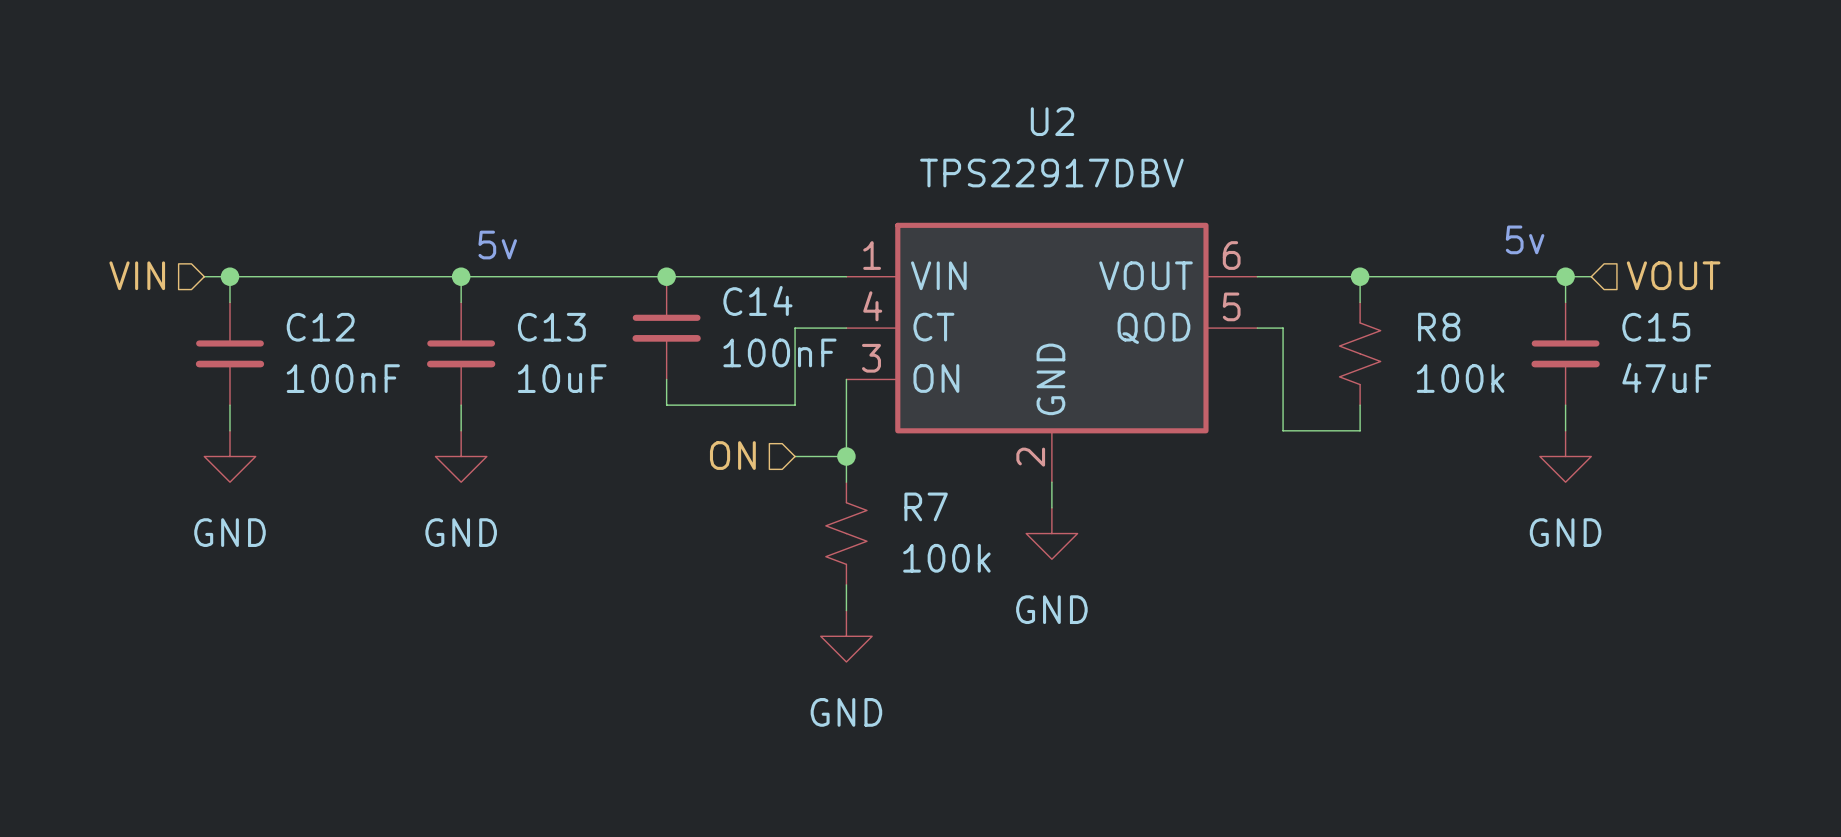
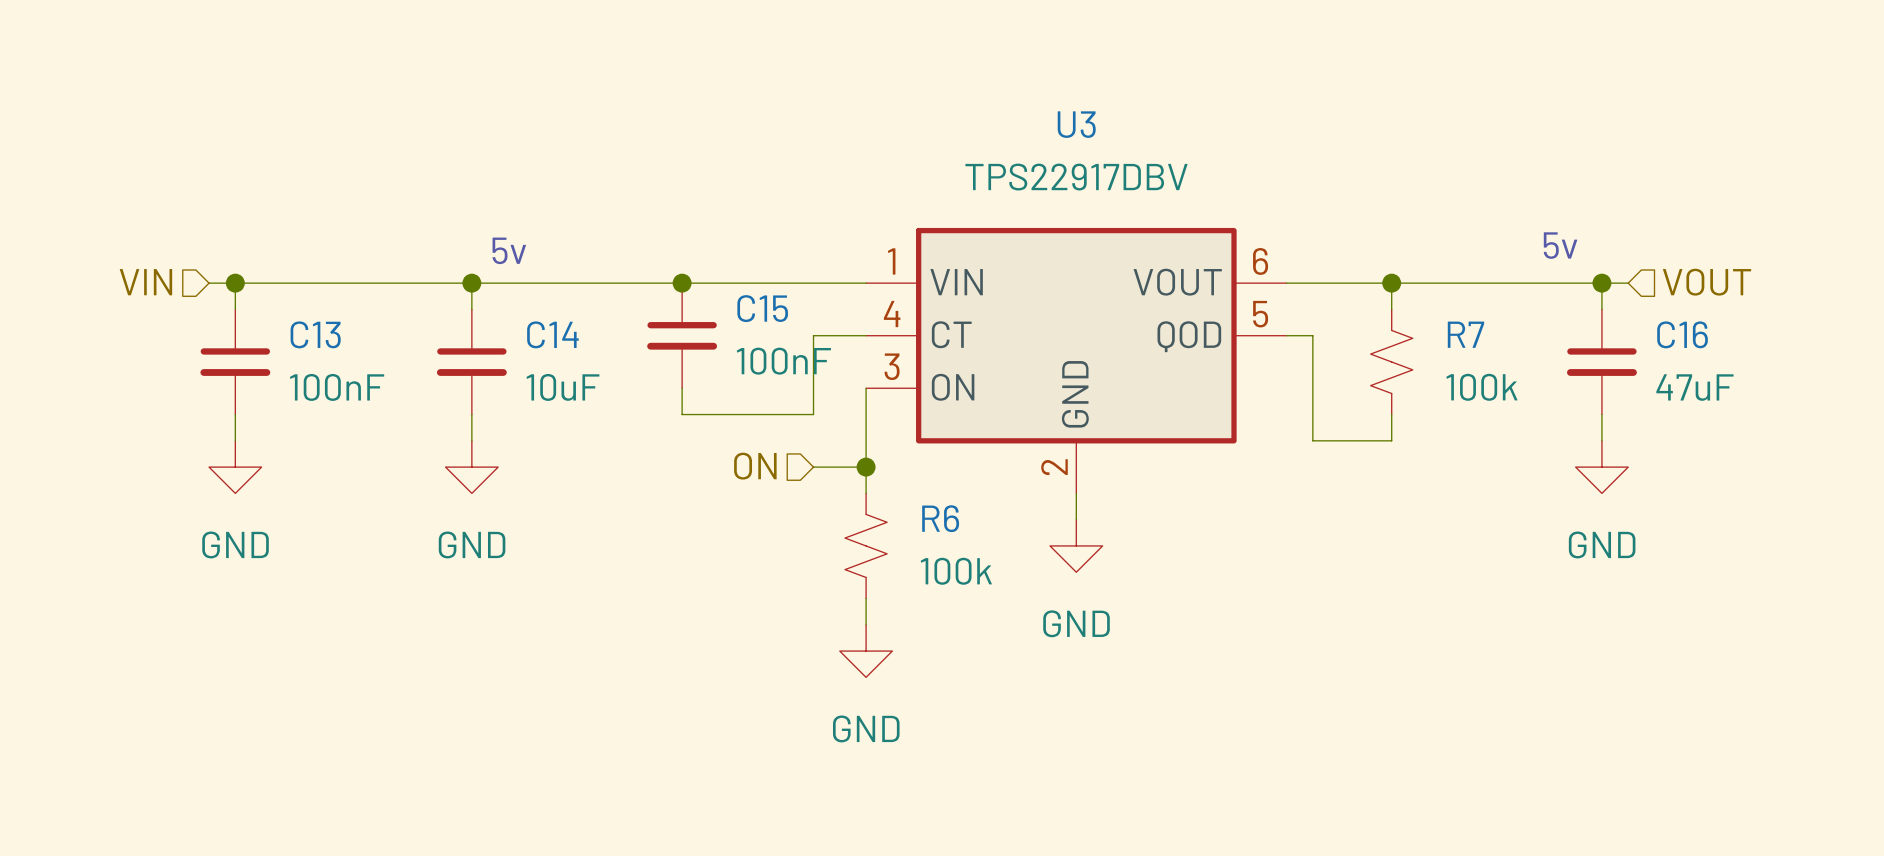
U2 name: U2 (1052, 121) -> U3 (1076, 124)
C14 name: C14 (757, 300) -> C15 (762, 308)
C12 name: C12 (320, 327) -> C13 (315, 334)
C13 name: C13 (551, 327) -> C14 (552, 334)
R8 name: R8 (1439, 327) -> R7 (1465, 334)
C15 name: C15 (1656, 327) -> C16 (1682, 334)
R7 name: R7 (926, 506) -> R6 (940, 518)

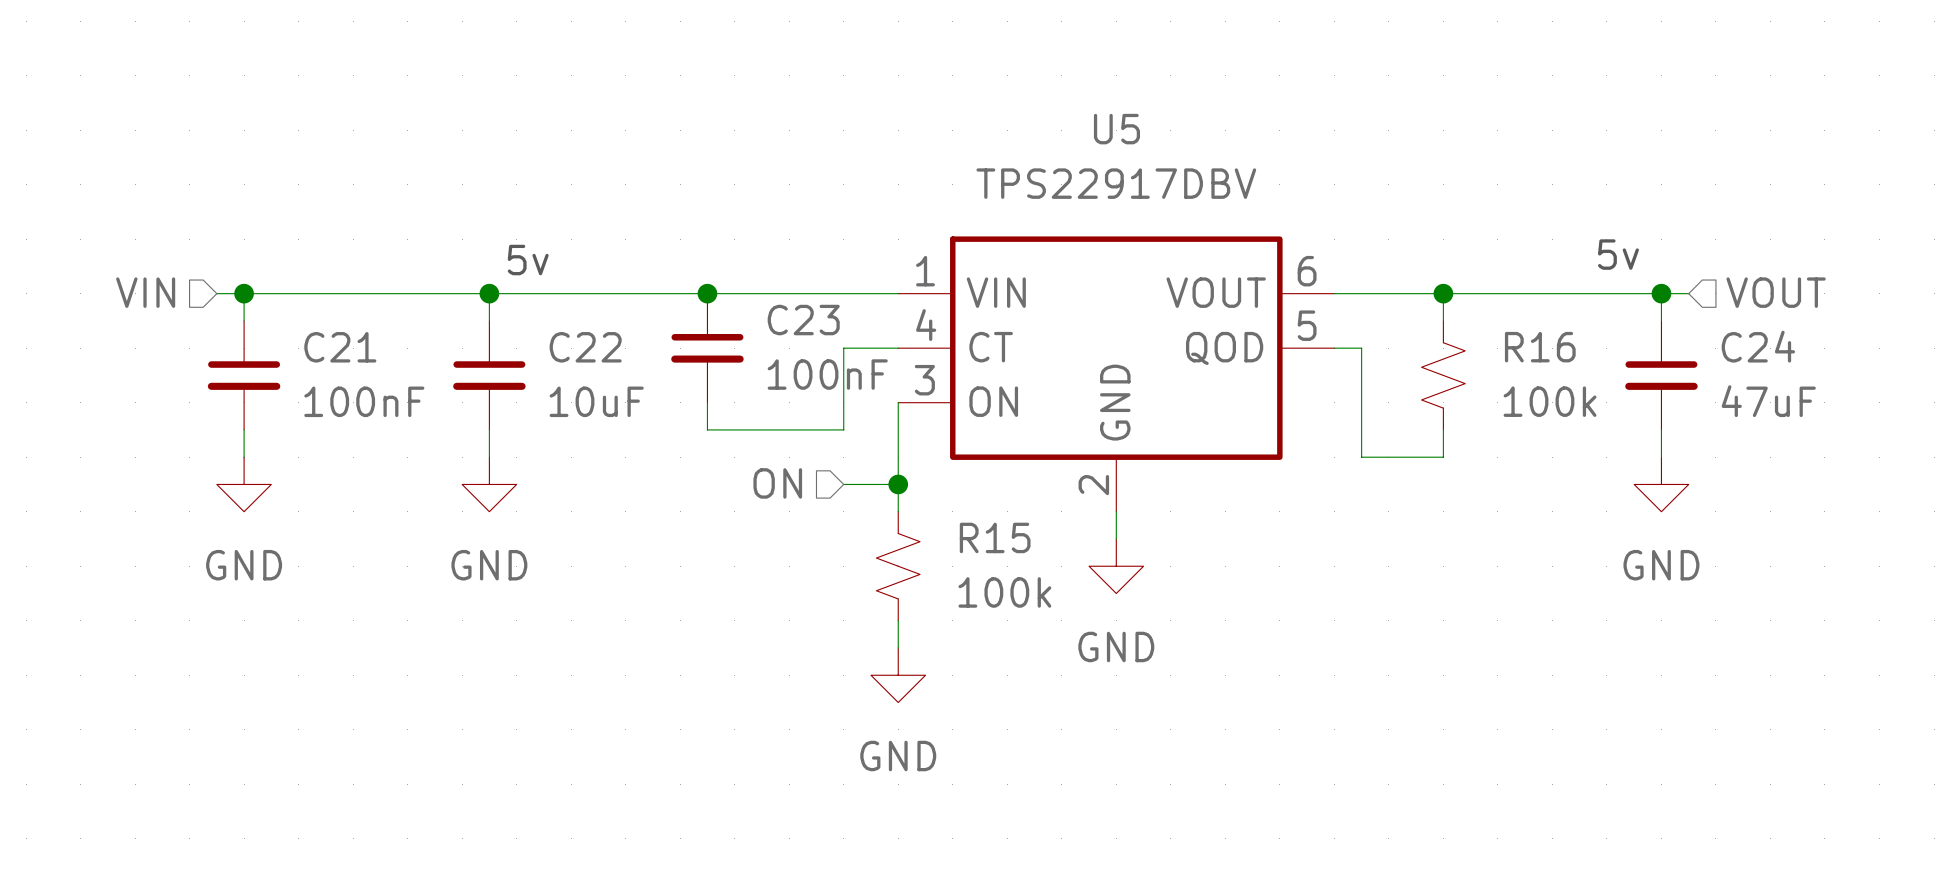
U3 name: U3 (1076, 124) -> U5 (1116, 129)
C15 name: C15 (762, 308) -> C23 (803, 320)
C13 name: C13 (315, 334) -> C21 (340, 347)
C14 name: C14 (552, 334) -> C22 (585, 347)
R7 name: R7 (1465, 334) -> R16 (1540, 347)
C16 name: C16 (1682, 334) -> C24 (1758, 346)
R6 name: R6 (940, 518) -> R15 (995, 537)

